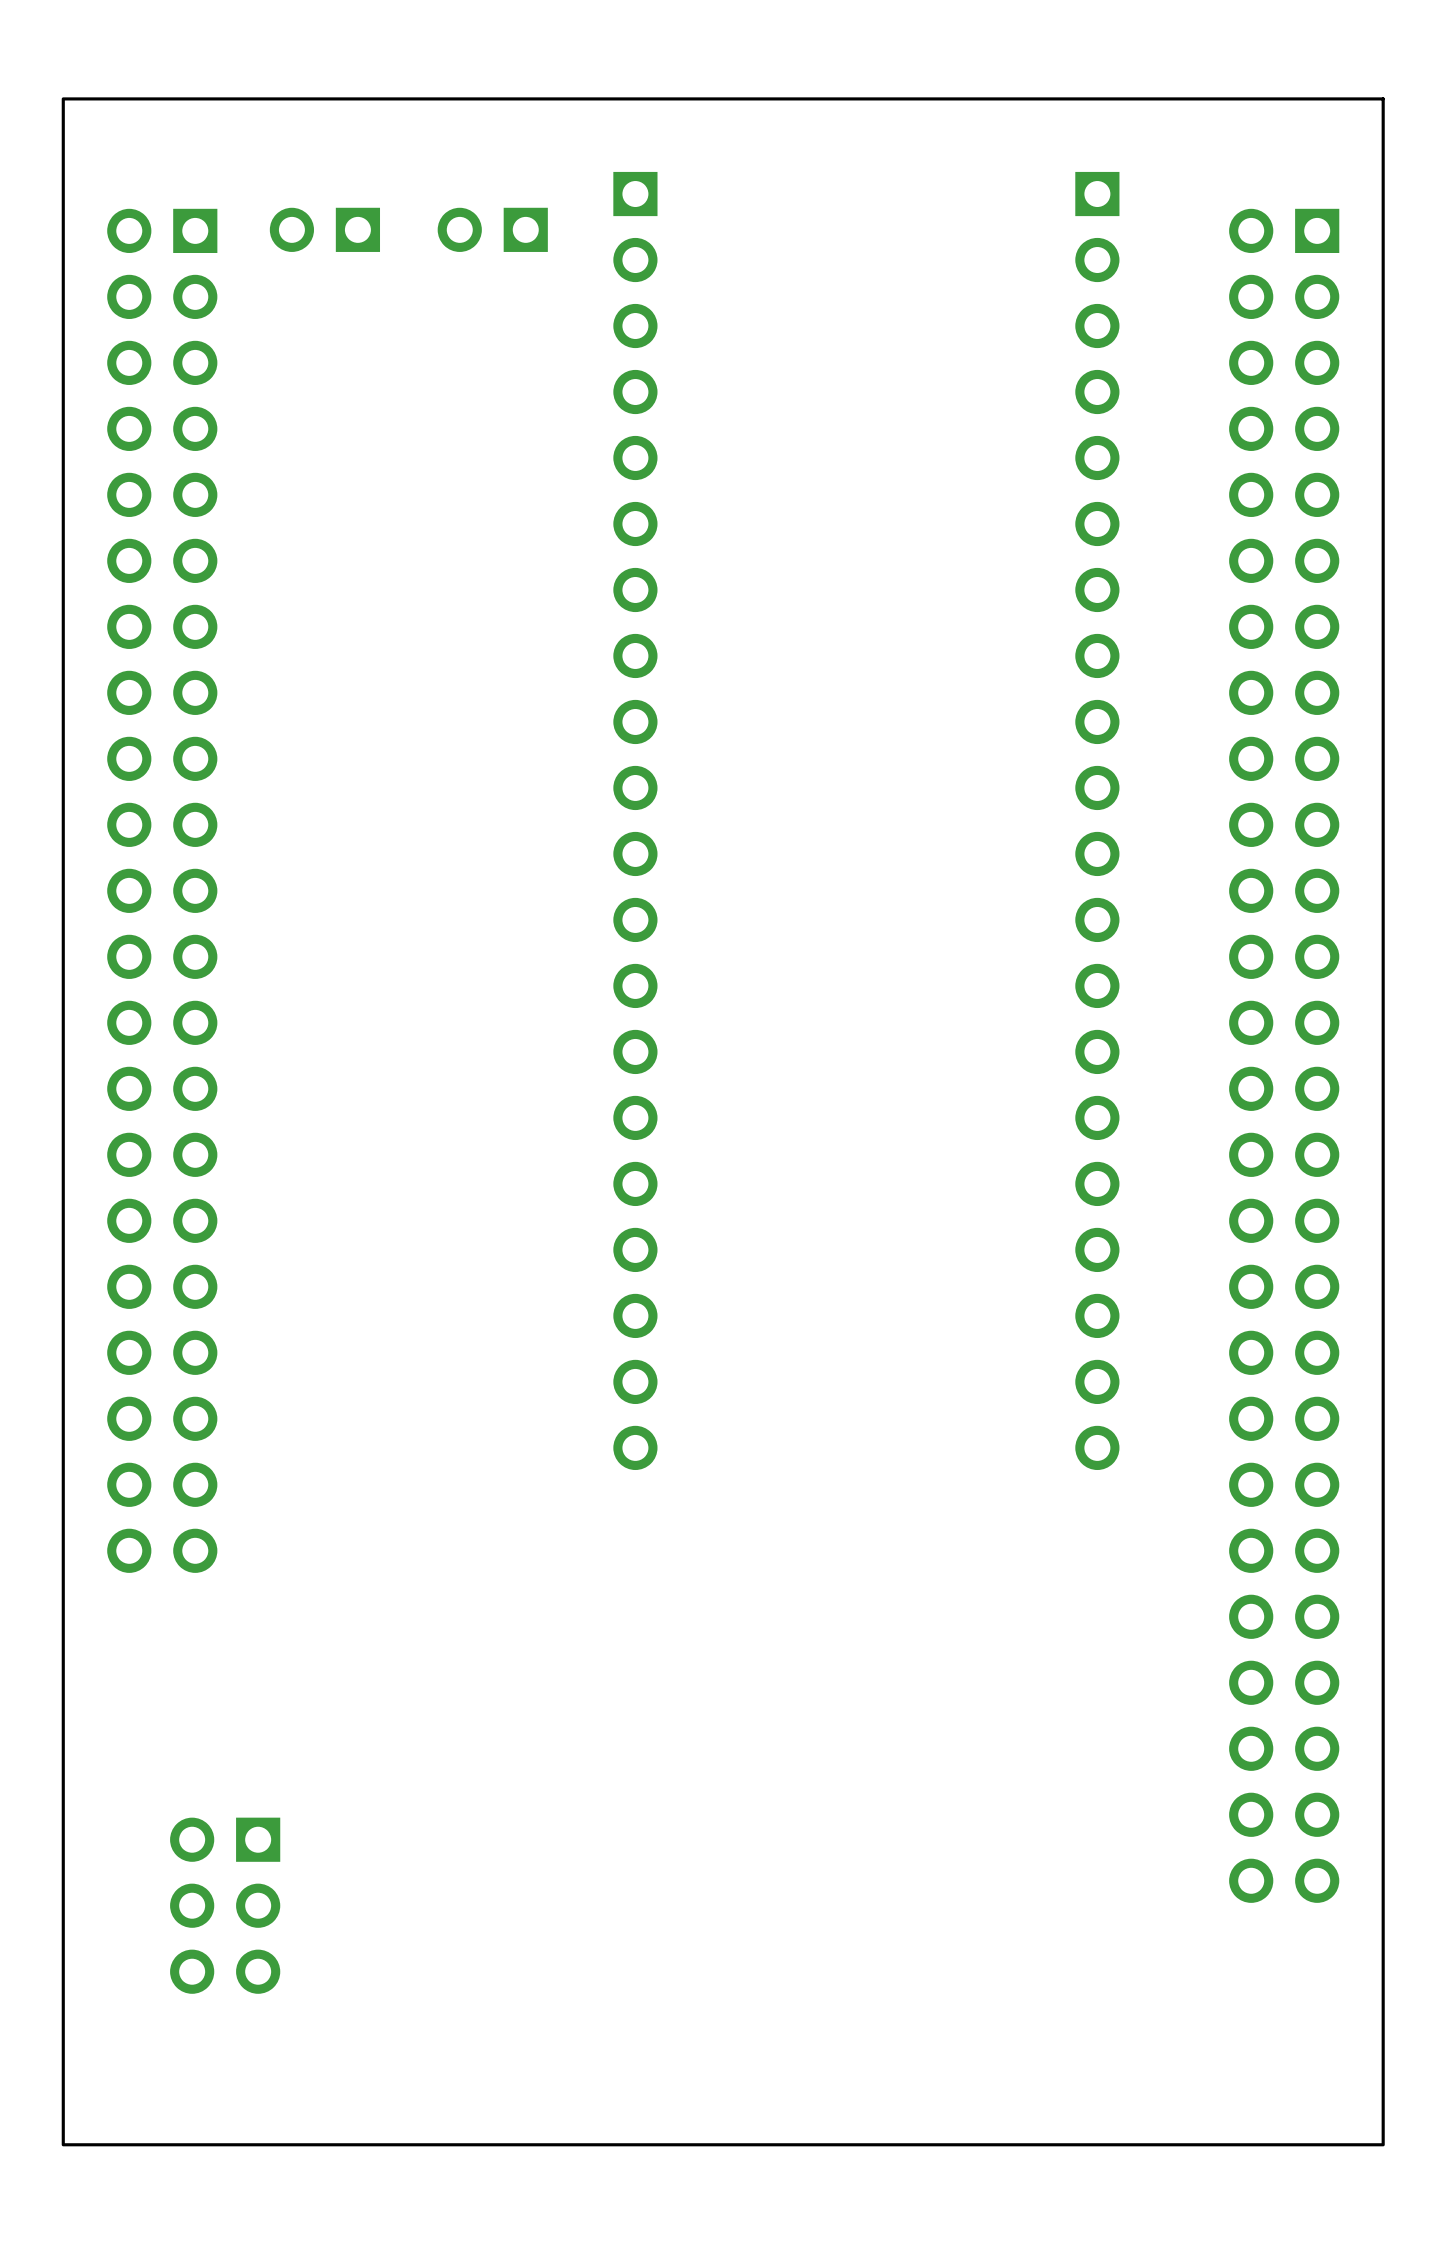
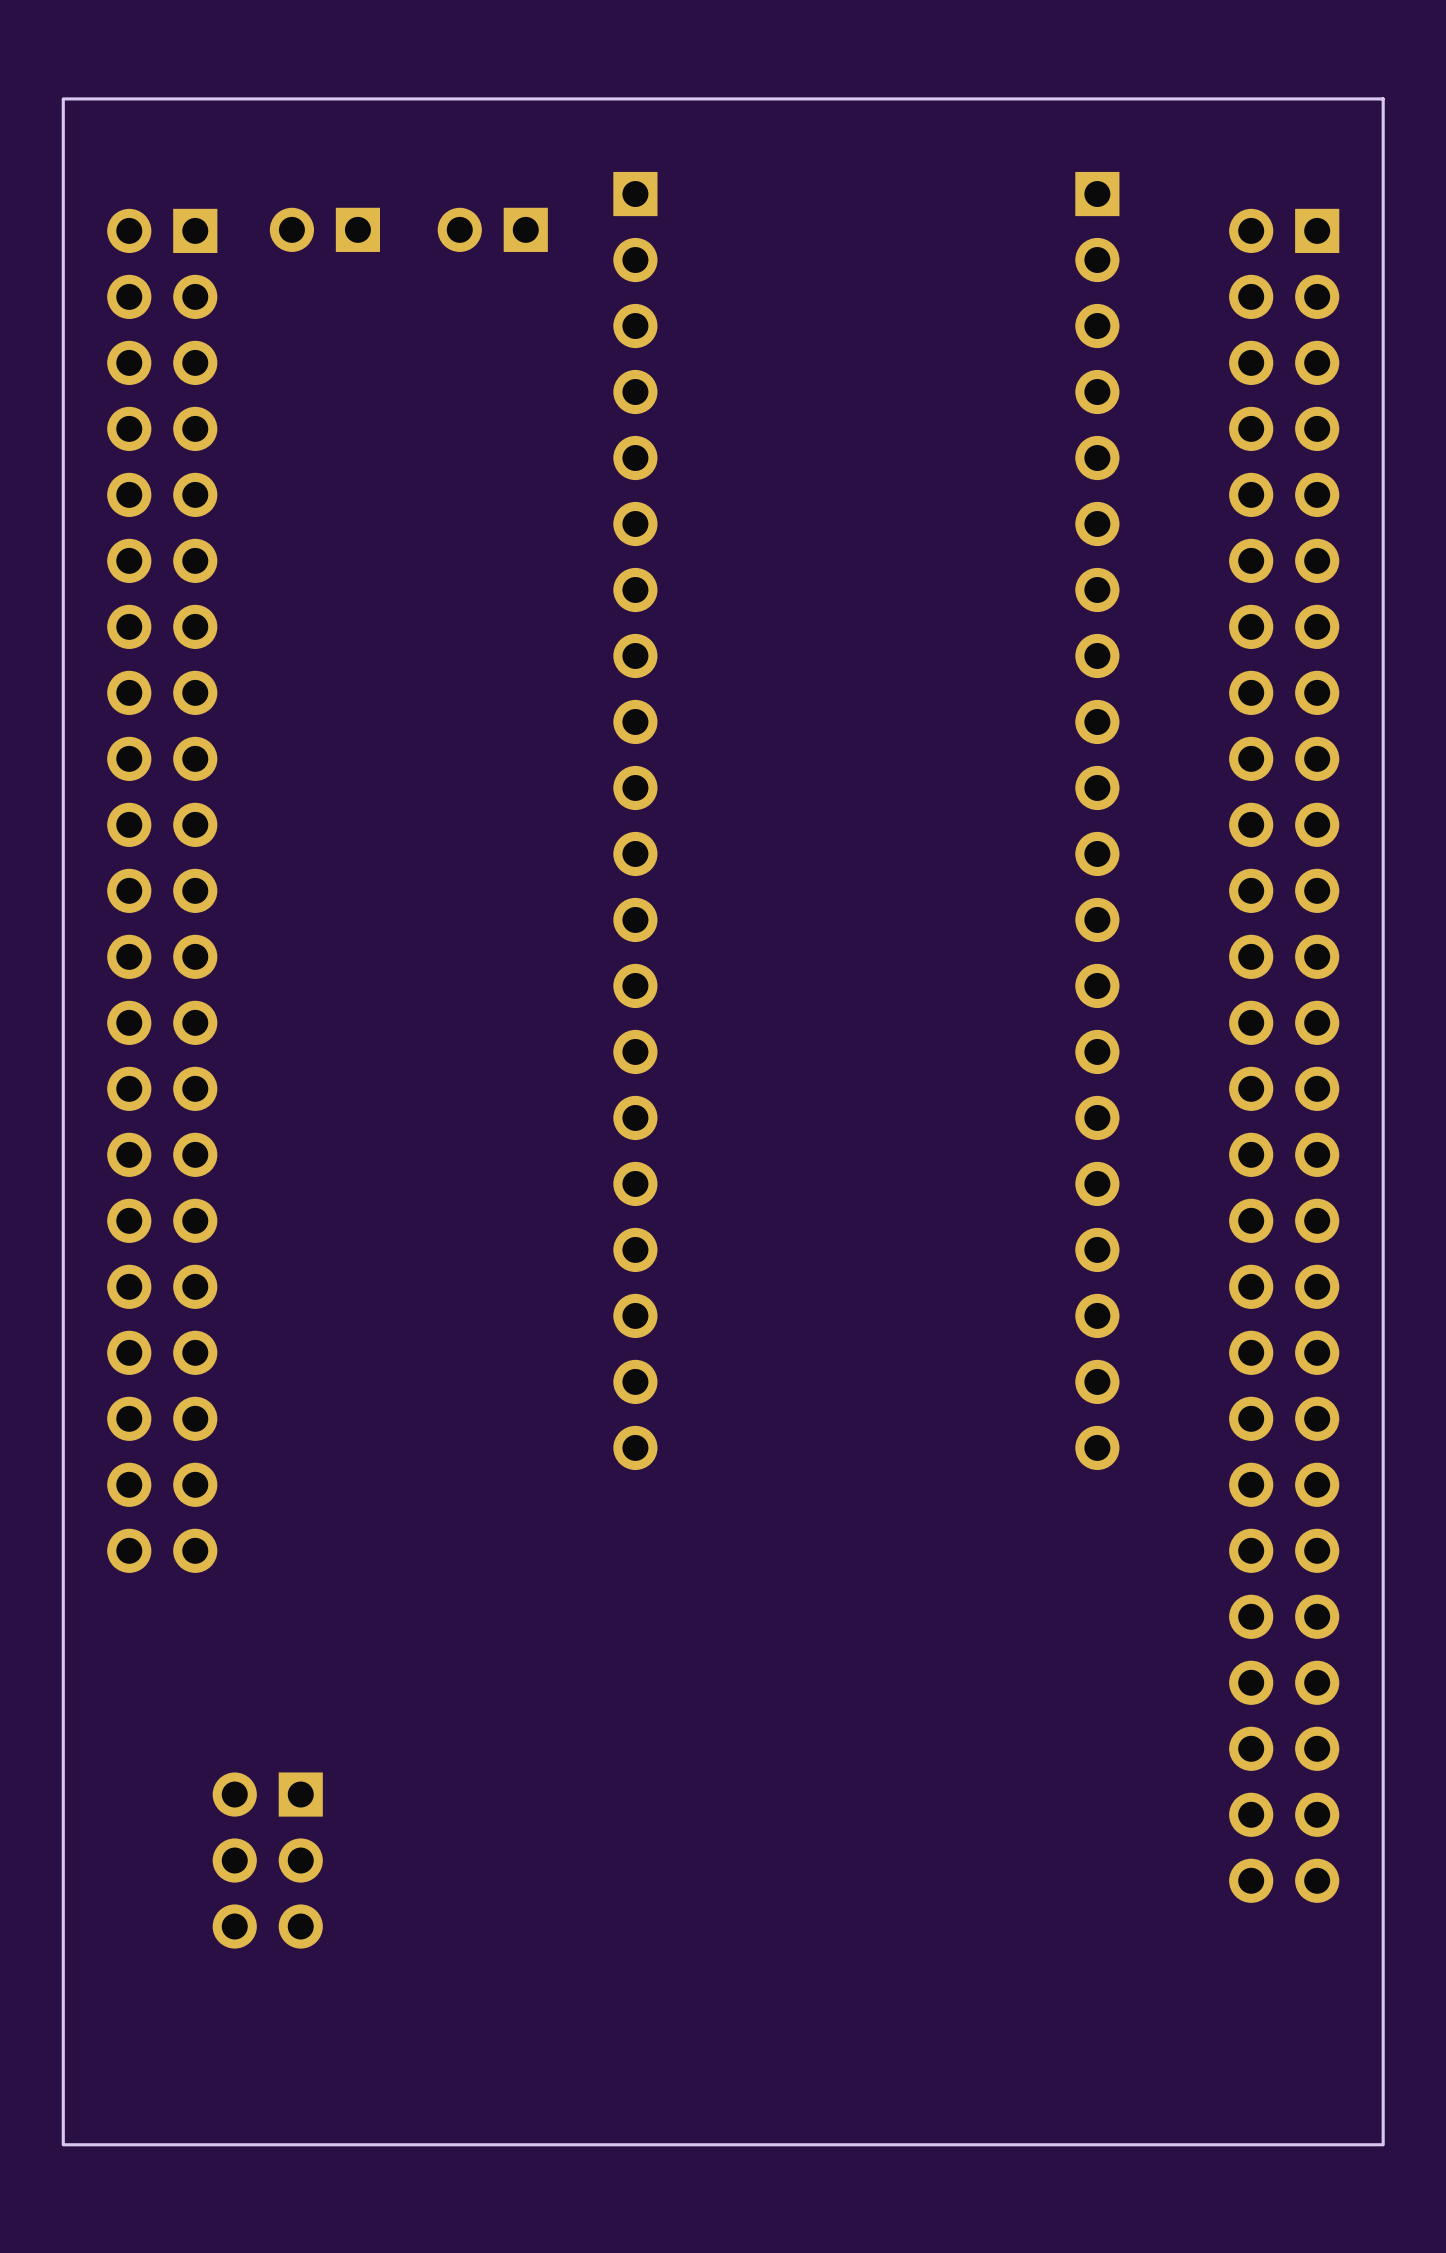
part position: (225, 1905) -> (267, 1860)

